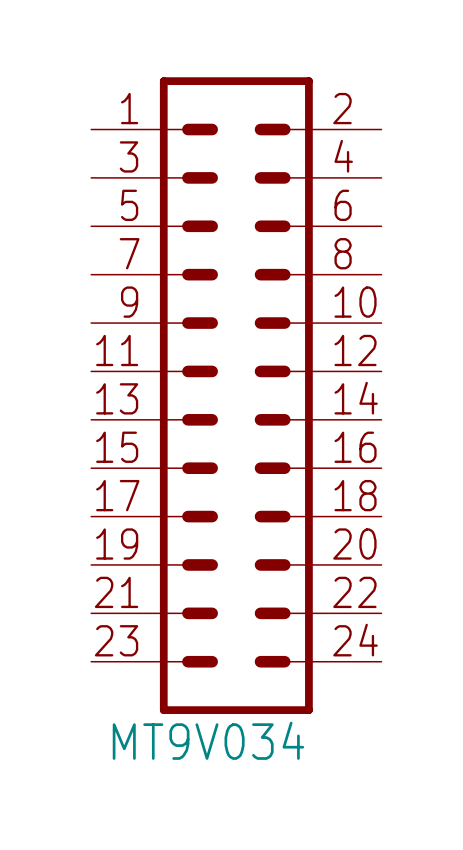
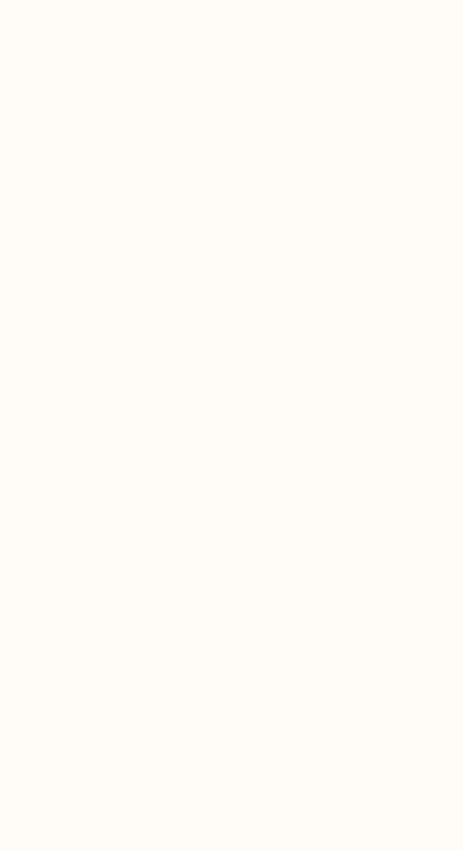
MT9V034: (236, 395) -> none

